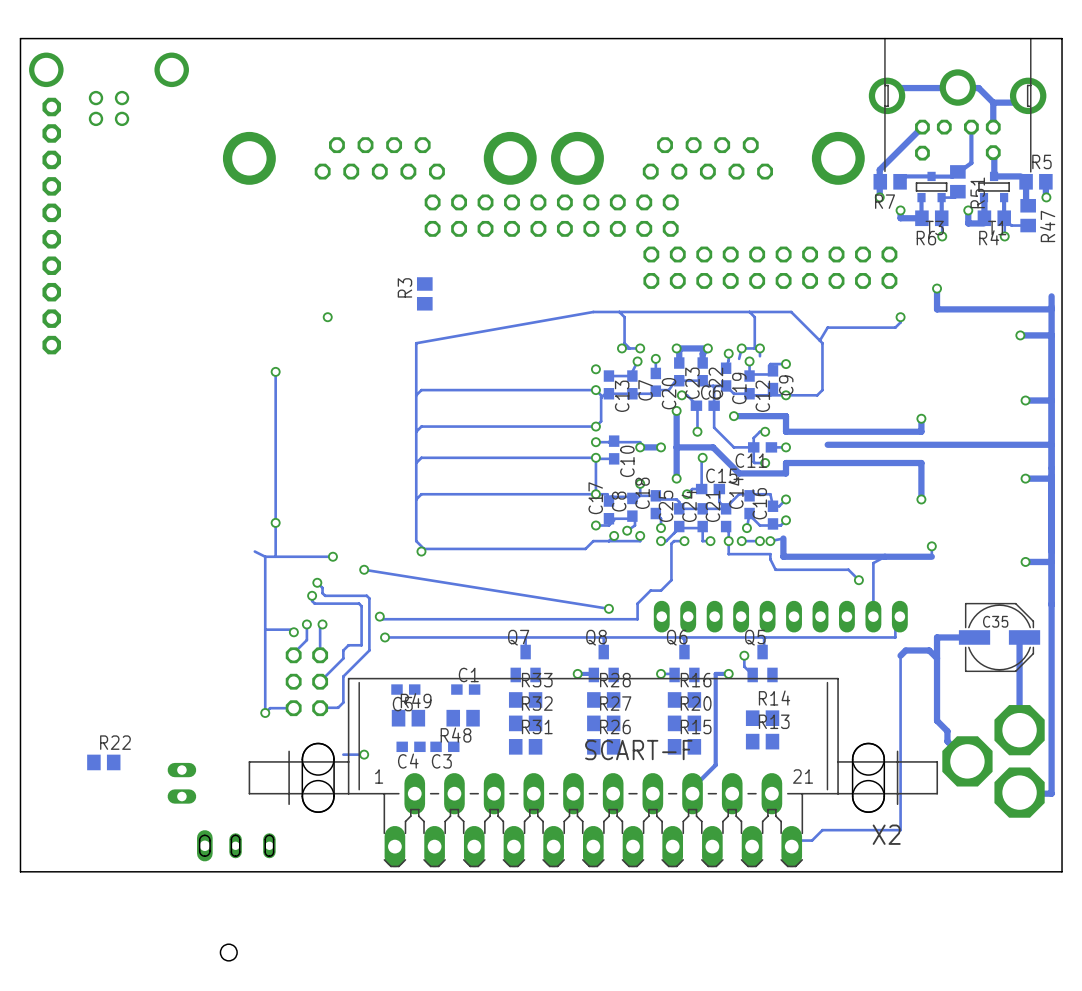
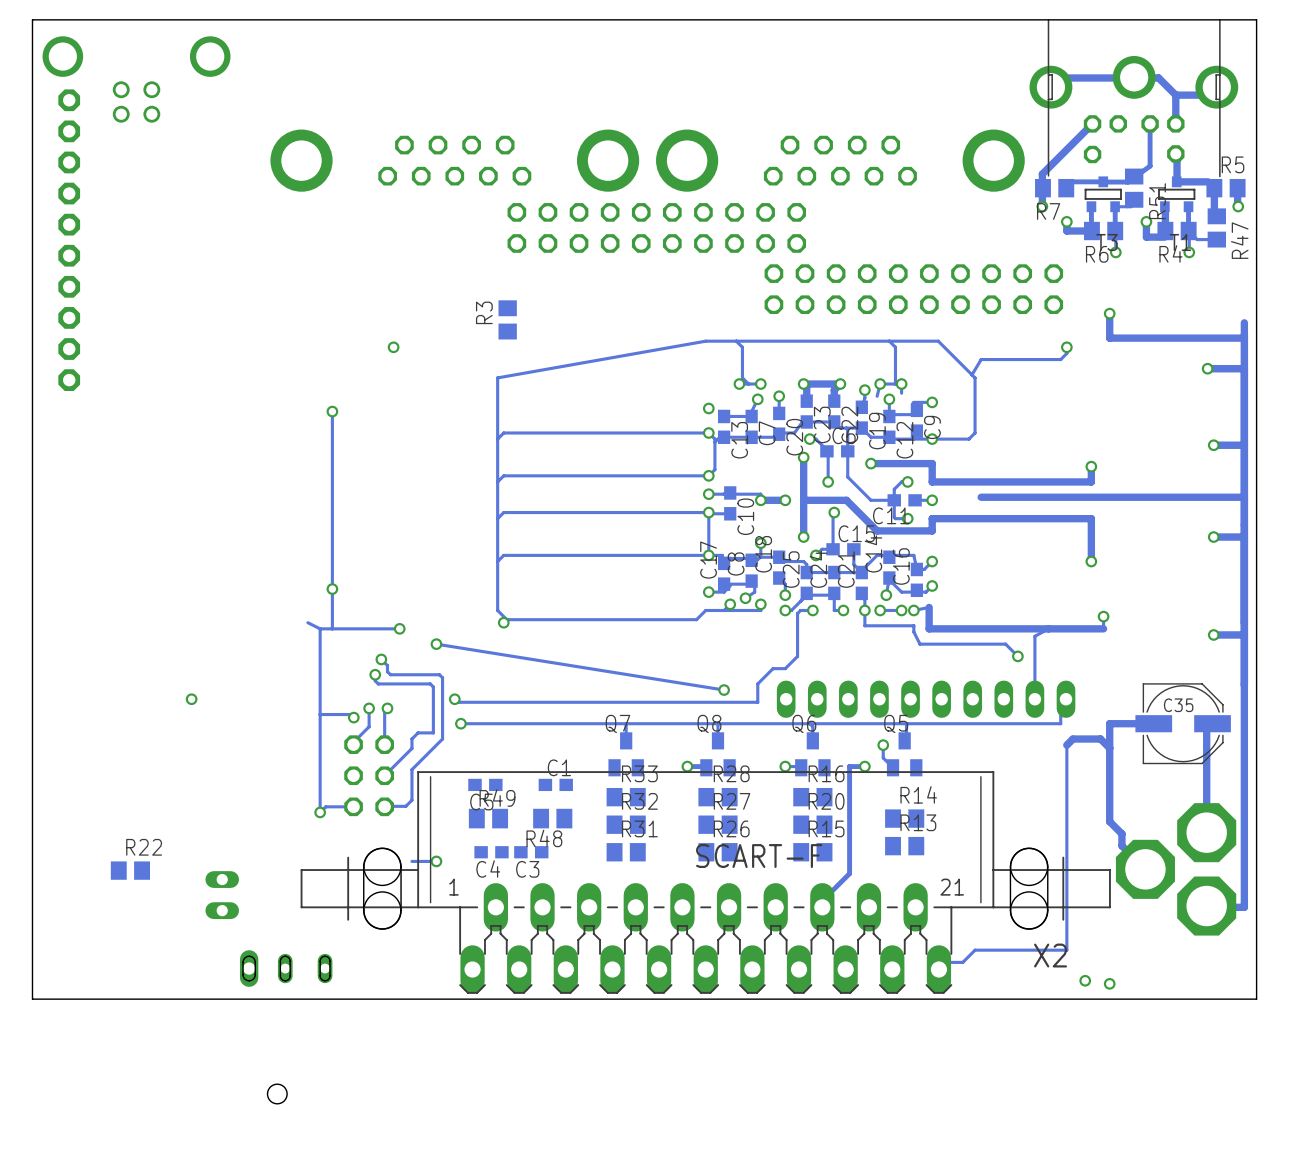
via: none -> (191, 699)
via: none -> (1085, 980)
via: none -> (1109, 983)

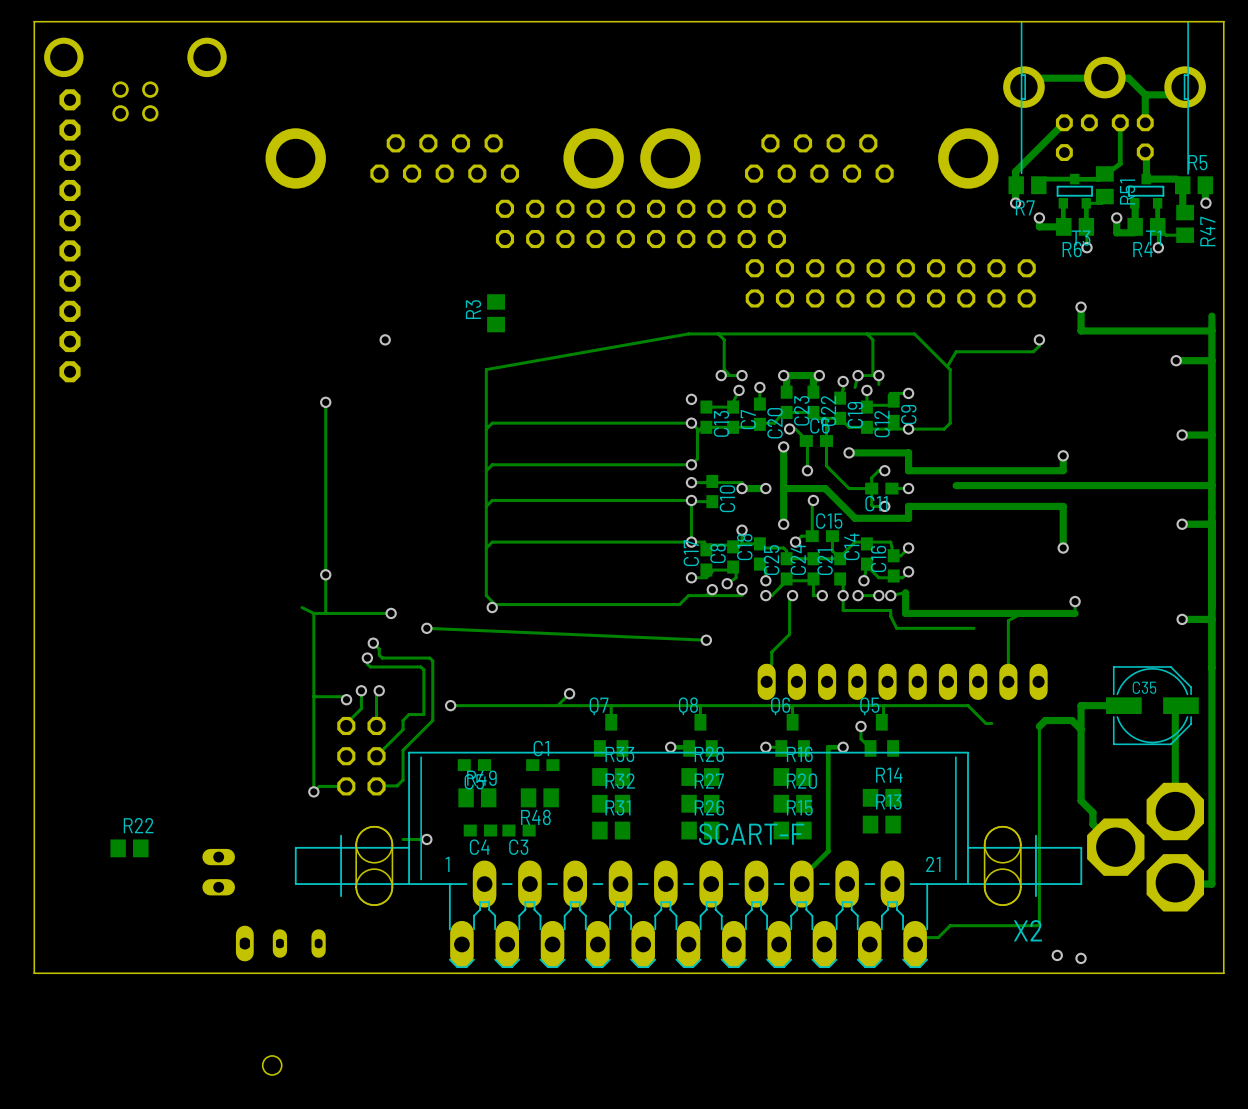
track: none -> (789, 595) (789, 634) (771, 652) (771, 664) (765, 669)
track: (812, 610) (800, 610) (797, 613) (797, 656) (785, 668) (773, 668) (757, 683) (757, 702) (457, 702) (454, 699) -> none
track: (436, 644) (724, 690) -> (426, 628) (706, 640)
track: (999, 644) (1005, 644) (1017, 656) -> none
via: (1017, 656) -> none
via position: (724, 690) -> (706, 640)
via: (191, 699) -> none
via: (454, 699) -> none
track: (1066, 699) (1060, 704) (1060, 723) (993, 723) -> (991, 723) (985, 723) (968, 705)
track: none -> (569, 693) (557, 705)
via: none -> (569, 693)

